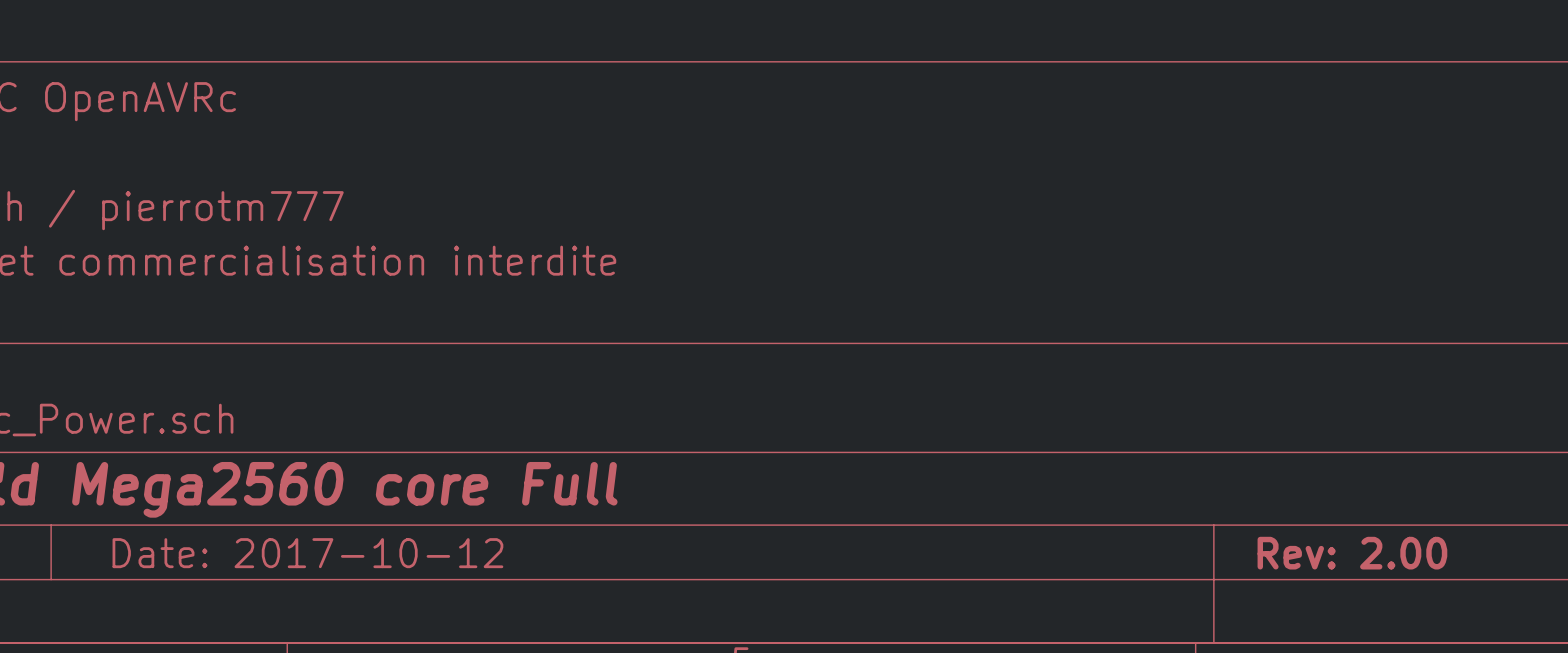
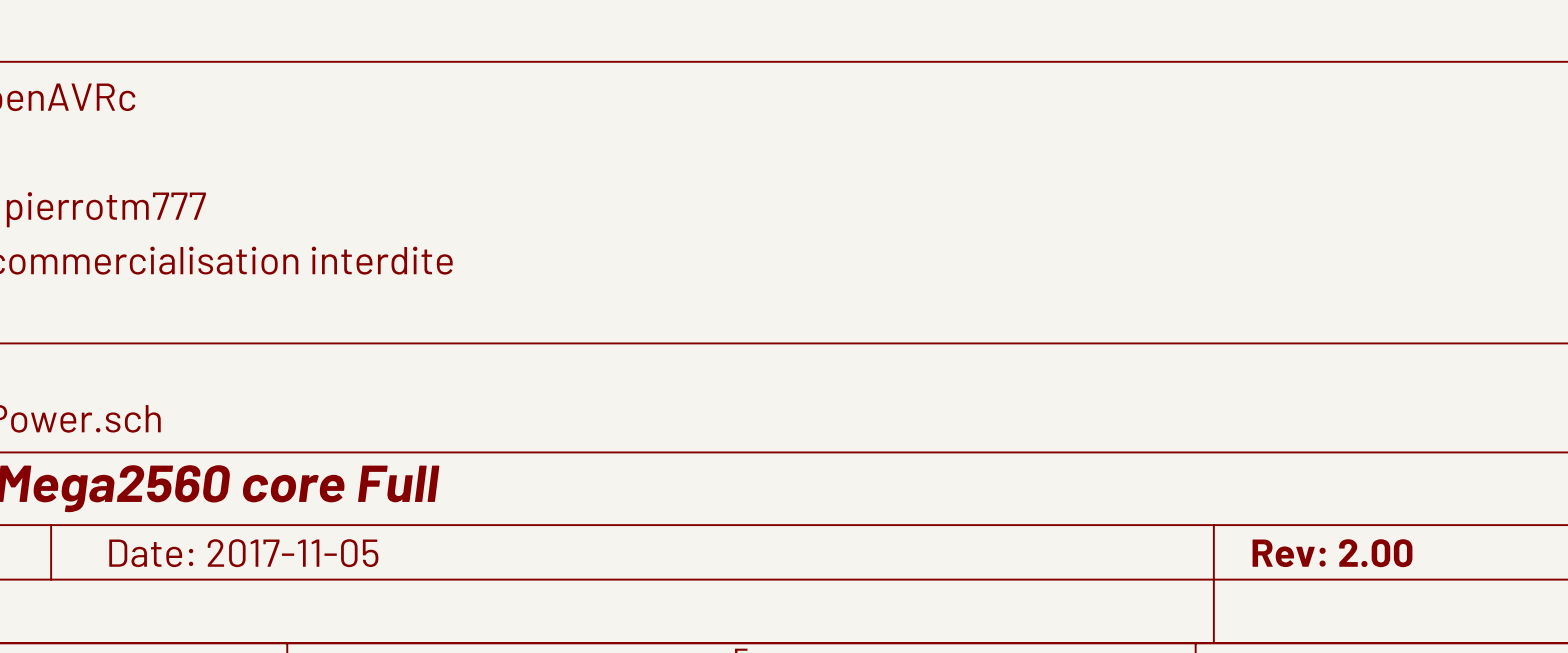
title block: Date: 2017-10-12 (307, 553) -> Date: 2017-11-05 (243, 553)

